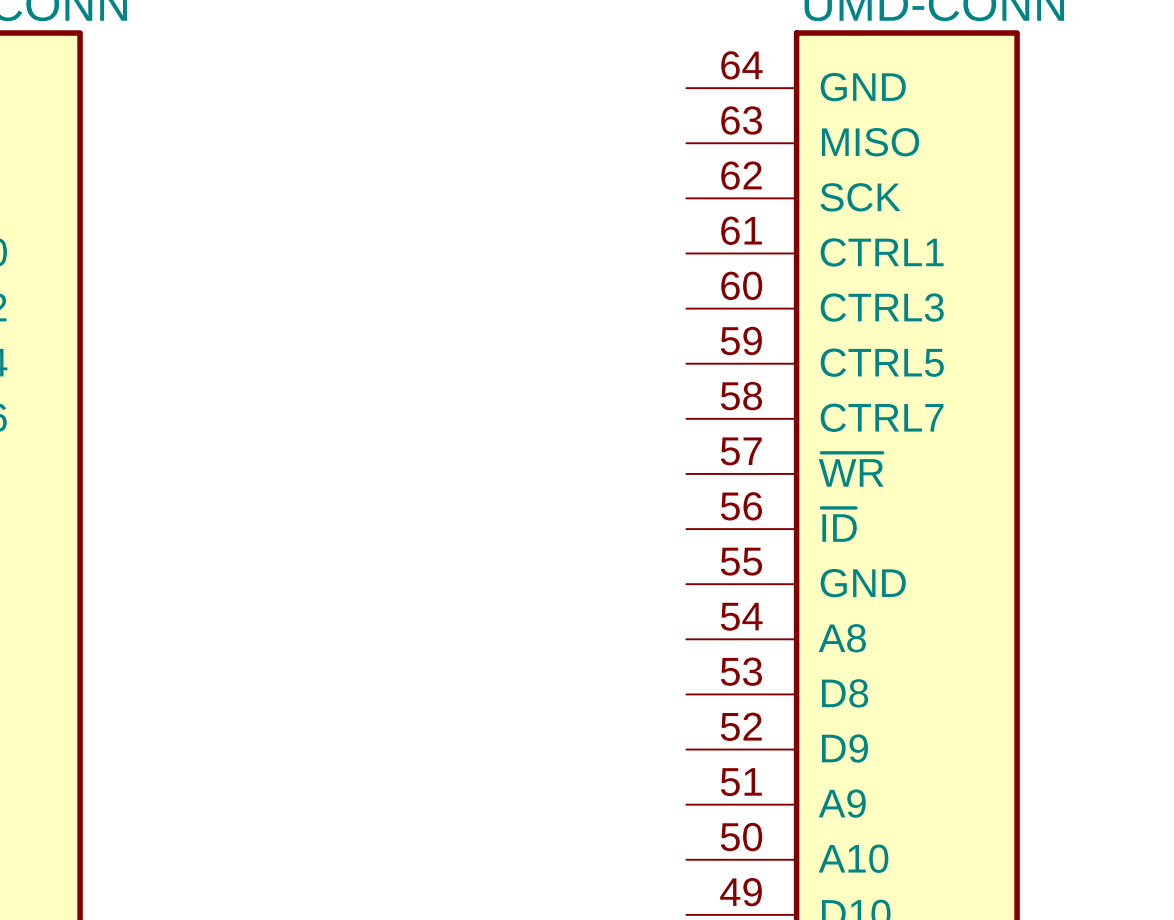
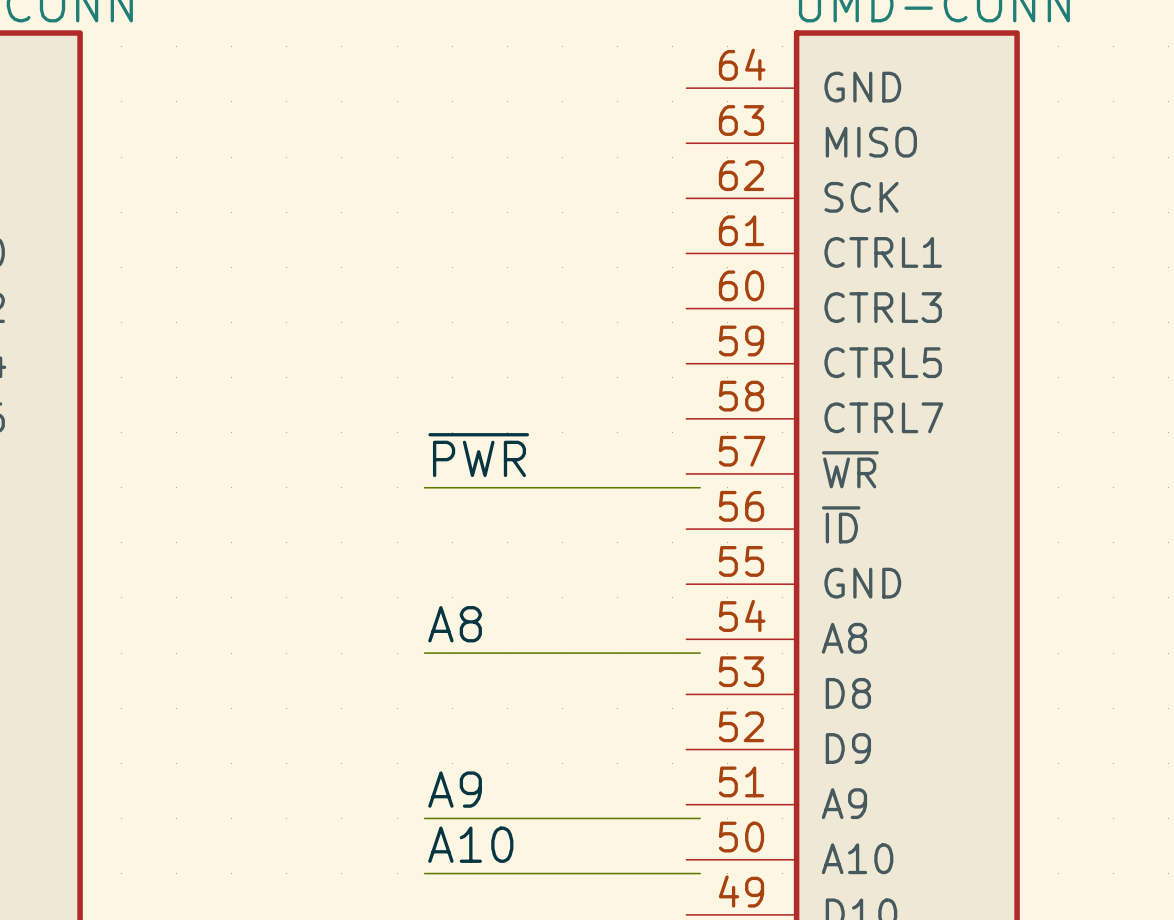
label: none -> ~{PWR} (478, 455)
wire: none -> (424, 487) (700, 487)
label: none -> A8 (455, 624)
wire: none -> (424, 653) (700, 653)
label: none -> A9 (455, 789)
wire: none -> (424, 818) (700, 818)
label: none -> A10 (470, 844)
wire: none -> (424, 873) (700, 873)

